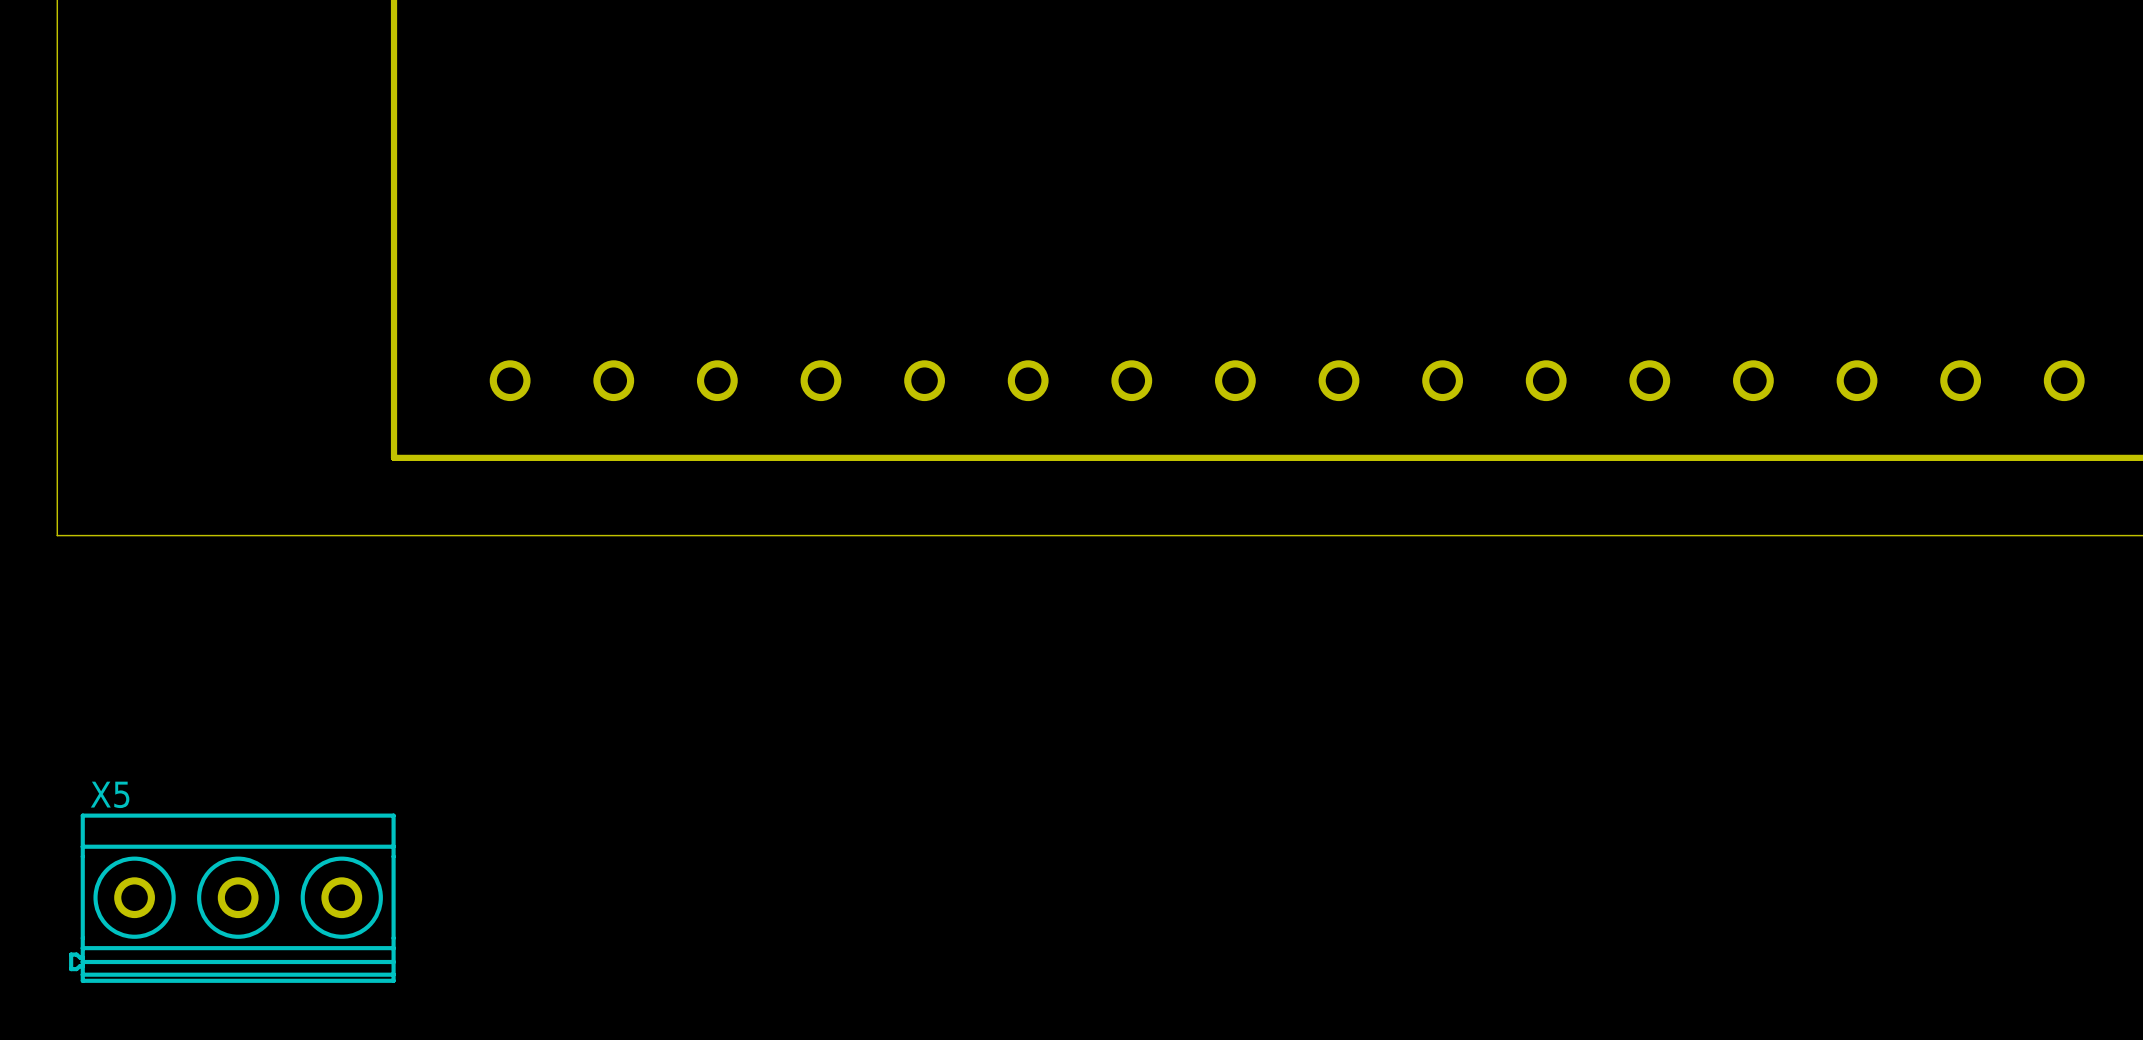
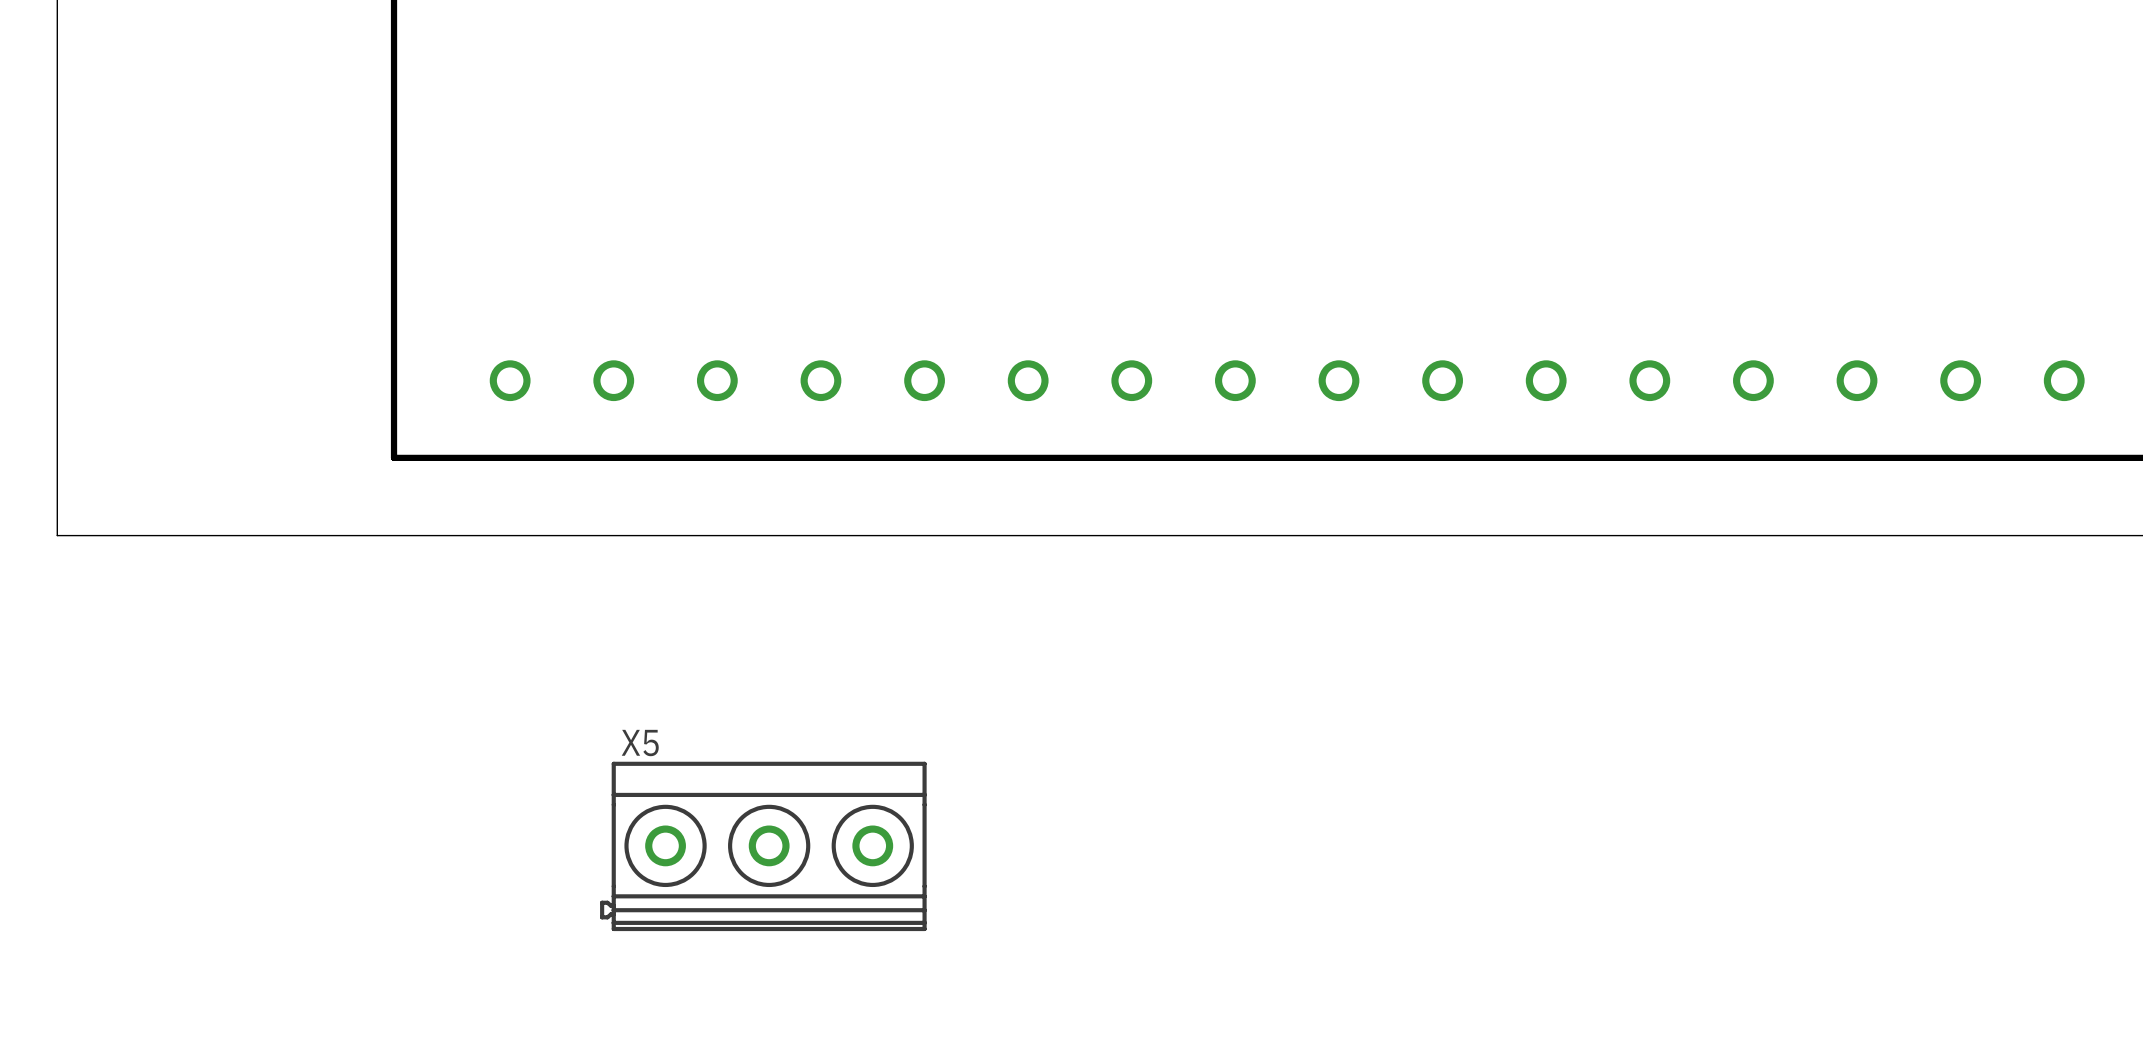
X5 position: (232, 898) -> (763, 846)

